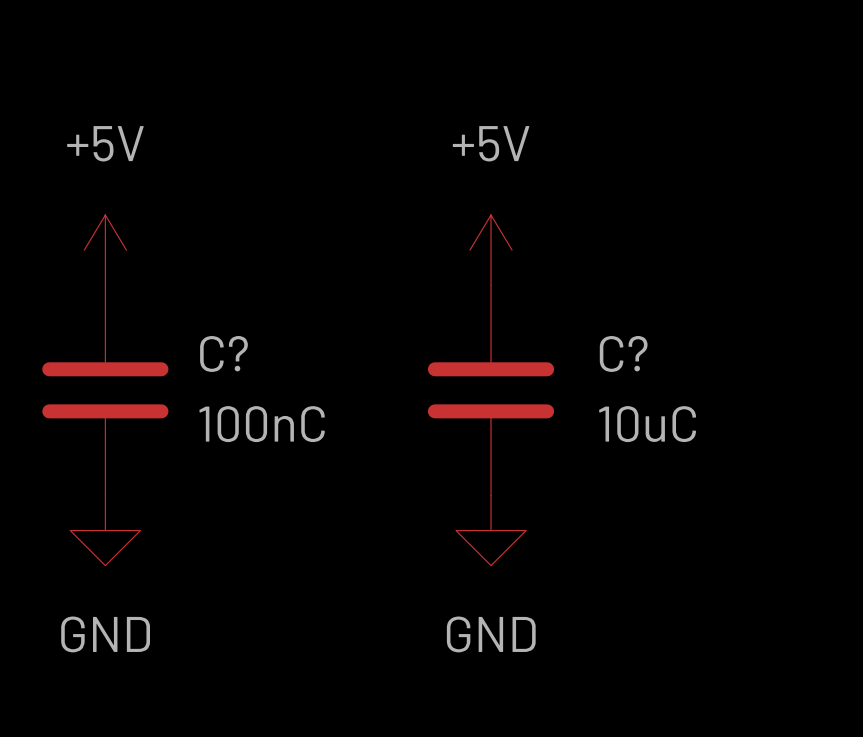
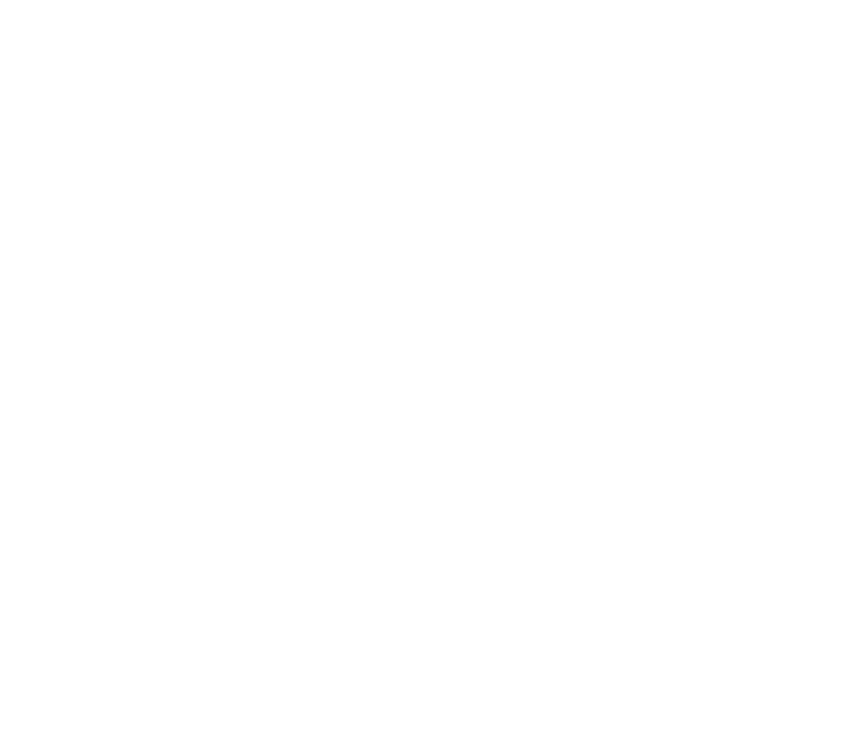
power symbol: +5V (105, 250) -> none
power symbol: +5V (491, 250) -> none
C?: 100nC (105, 390) -> none
C?: 10uC (491, 390) -> none
power symbol: GND (105, 530) -> none
power symbol: GND (491, 530) -> none

